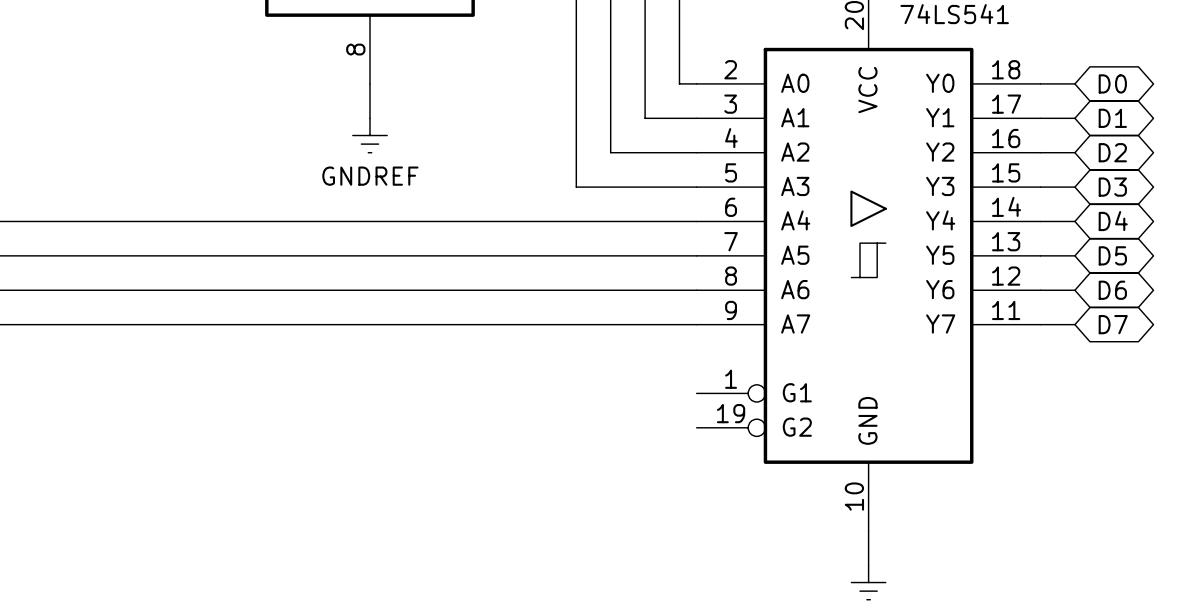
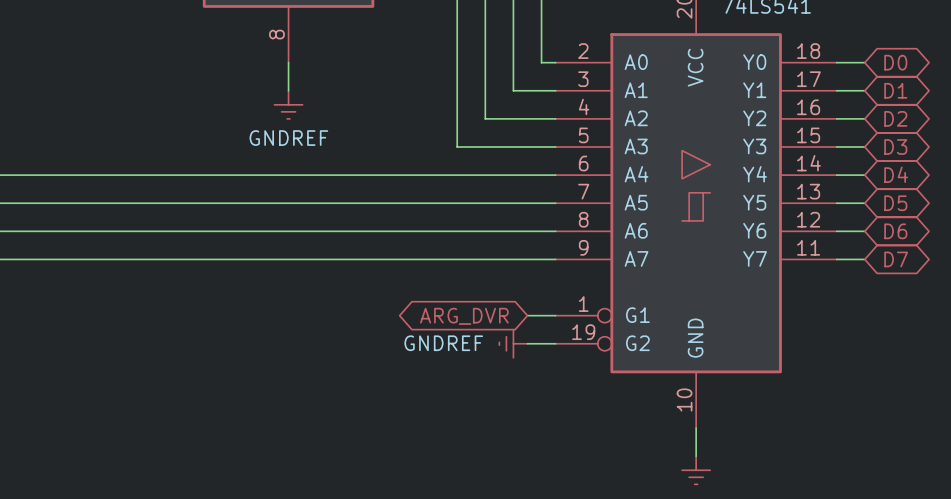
wire: none -> (527, 315) (555, 315)
global label: none -> ARG_DVR (464, 316)
power symbol: none -> GNDREF (513, 343)
wire: none -> (527, 343) (555, 343)

